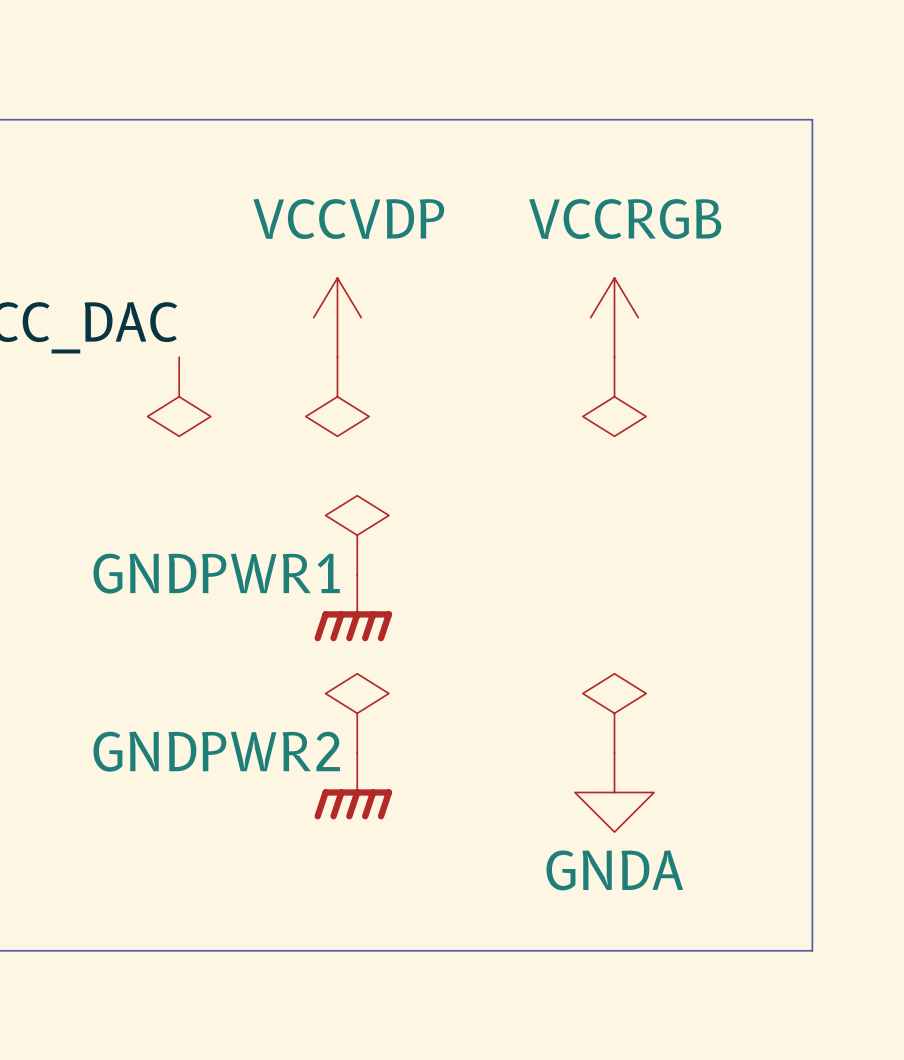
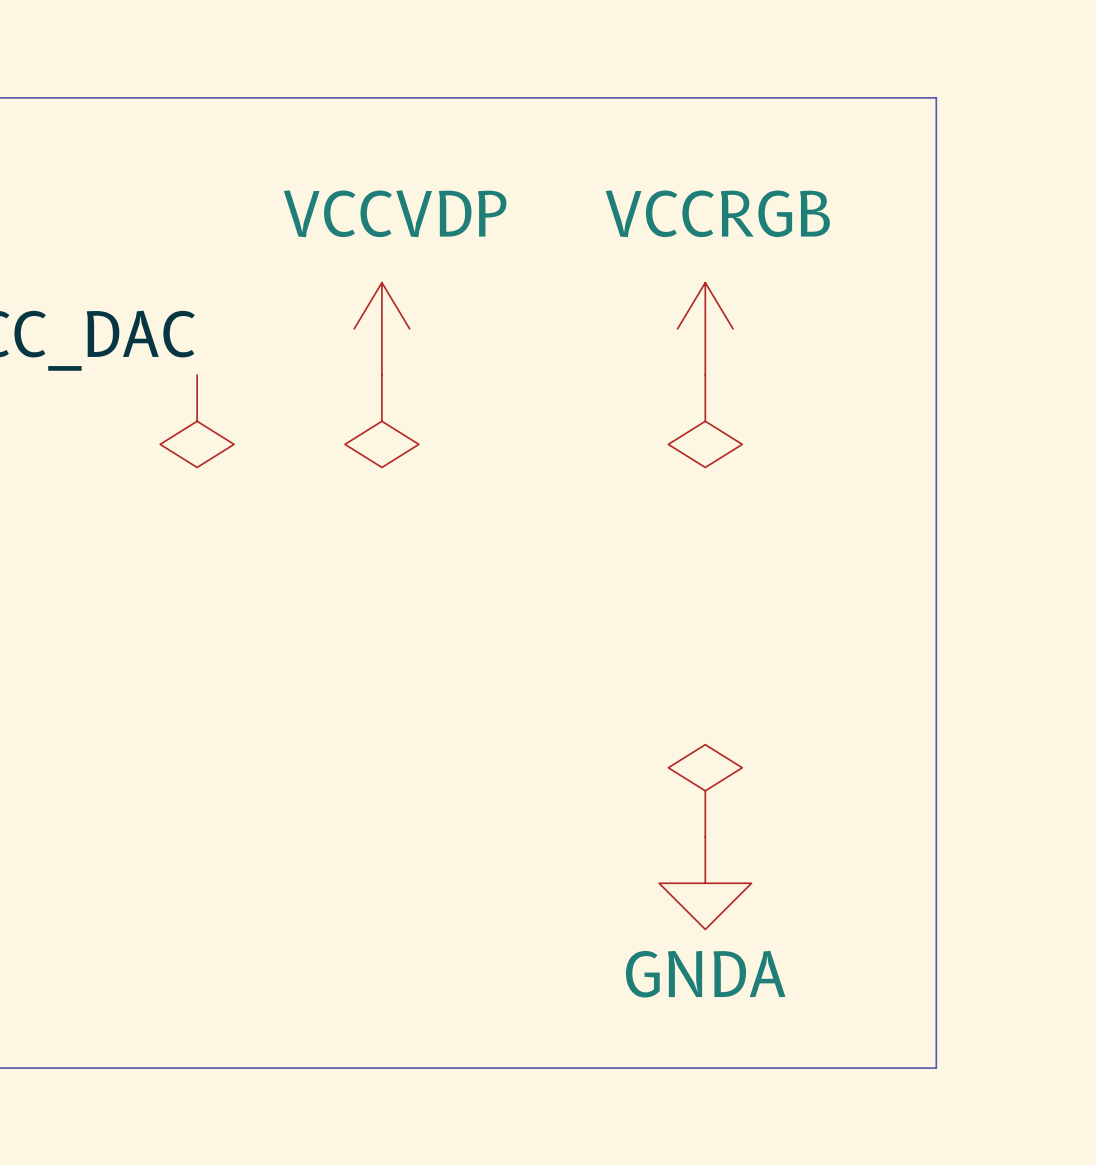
power symbol: (357, 535) -> none
power symbol: GNDPWR1 (353, 608) -> none
power symbol: (357, 713) -> none
power symbol: GNDPWR2 (353, 786) -> none

